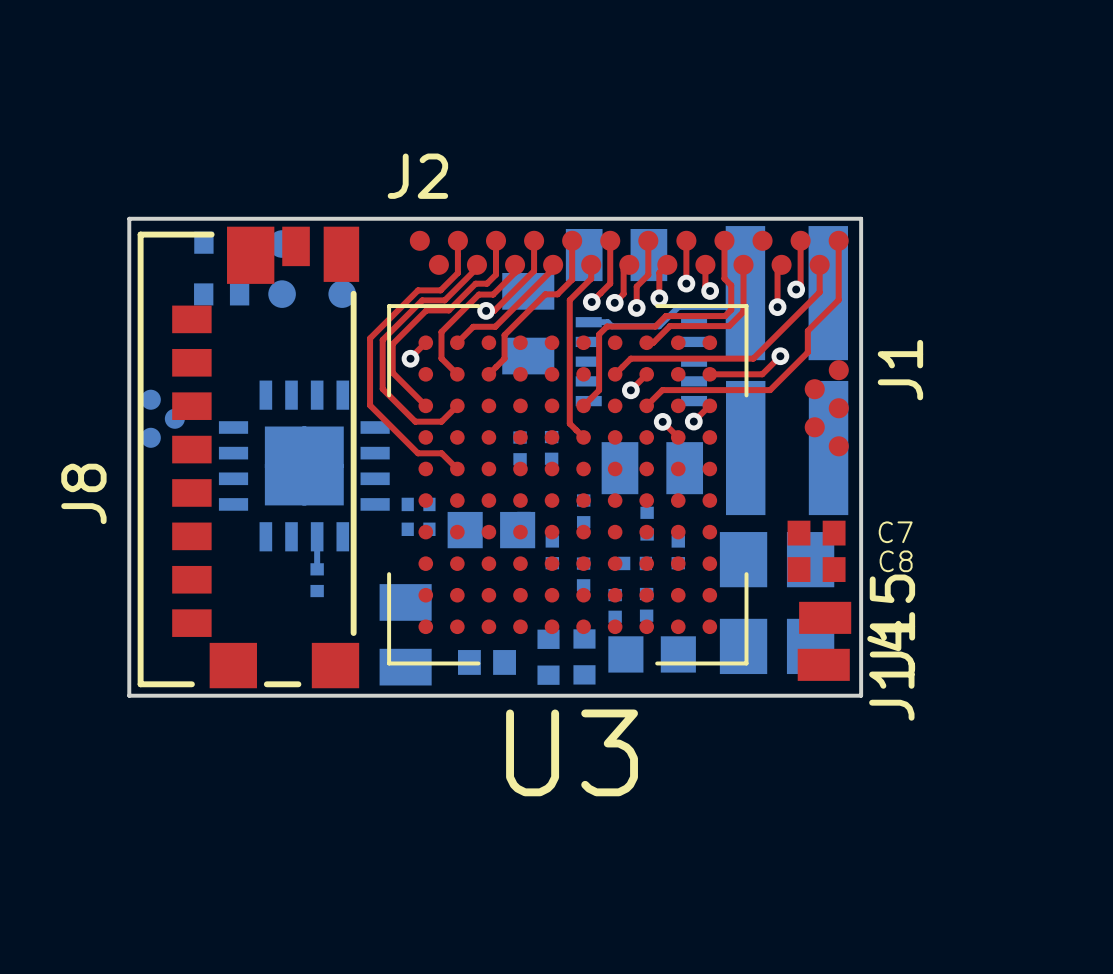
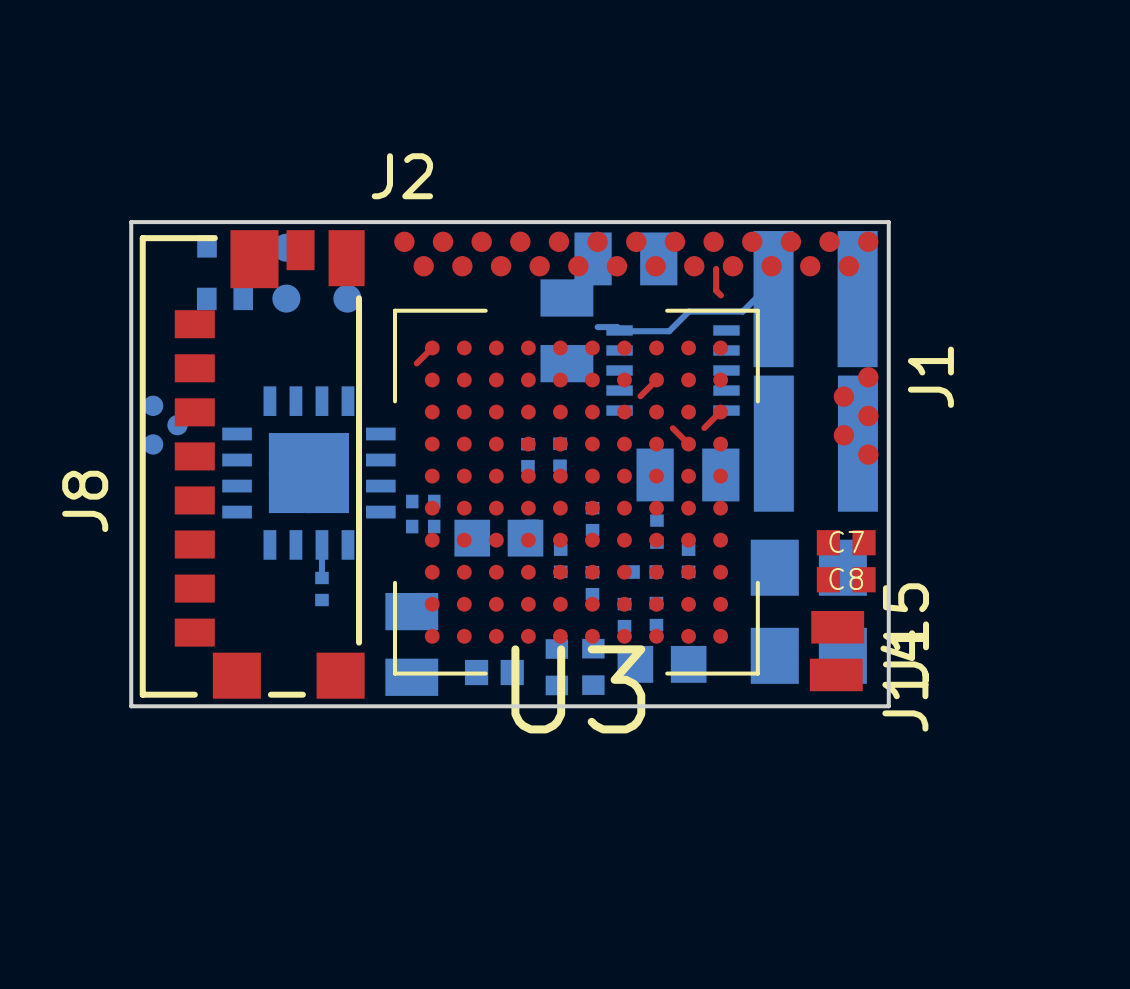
J2 name position: J2 (417, 176) -> J2 (402, 176)
board edge: (861, 218) (861, 695) -> (874, 222) (888, 222) (888, 706) (874, 706)
J2 footprint: [409, 230, 849, 275] -> [394, 231, 879, 277]
top track: (457, 240) (457, 273) (440, 290) (418, 290) (370, 338) (370, 405) (417, 453) (441, 453) (457, 468) -> none
top track: (496, 240) (496, 274) (486, 283) (475, 283) (448, 310) (426, 310) (392, 344) (392, 372) (425, 405) -> none
top track: (534, 240) (534, 271) (494, 310) (486, 310) -> none
top track: (572, 240) (572, 279) (557, 294) (545, 294) (504, 335) (504, 358) (488, 374) -> none
top track: (610, 240) (610, 283) (591, 302) -> none
top track: (648, 240) (648, 274) (636, 286) (636, 307) -> none
top track: (686, 240) (686, 283) -> none
top track: (724, 240) (724, 278) (731, 285) (731, 309) (725, 316) (665, 316) (655, 326) (607, 326) (599, 334) (599, 390) (583, 405) -> none
top track: (800, 240) (800, 285) (796, 289) -> none
top track: (838, 240) (838, 300) (807, 330) (807, 352) (770, 390) (662, 390) (646, 405) -> none
top track: (476, 264) (476, 268) (444, 300) (422, 300) (382, 339) (382, 389) (415, 421) (441, 421) (457, 405) -> none
top track: (515, 264) (515, 272) (493, 294) (478, 294) (441, 332) (441, 358) (457, 374) -> none
top track: (553, 264) (553, 268) (495, 326) (473, 326) (457, 342) -> none
top track: (591, 264) (591, 278) (569, 300) (569, 423) (583, 437) -> none
top track: (629, 264) (623, 270) (623, 293) (614, 302) -> none
top track: (667, 264) (659, 272) (659, 298) -> none
top track: (743, 264) (743, 311) (729, 326) (669, 326) (653, 342) (646, 342) -> none
top track: (781, 264) (777, 268) (777, 307) -> none
top track: (819, 264) (819, 292) (753, 358) (630, 358) (615, 374) -> none
via: (686, 283) -> none
via: (796, 289) -> none
via: (710, 291) -> none
part position: (786, 293) -> (815, 299)
via: (659, 298) -> none
via: (591, 302) -> none
via: (614, 302) -> none
via: (636, 307) -> none
via: (777, 307) -> none
via: (486, 310) -> none
part position: (528, 323) -> (566, 330)
top track: (780, 356) (762, 374) (709, 374) -> none
via: (780, 356) -> none
via: (410, 358) -> none
part position: (641, 361) -> (673, 370)
via: (630, 390) -> none
J1 position: (826, 408) -> (856, 415)
via: (662, 421) -> none
via: (693, 421) -> none
part position: (787, 448) -> (815, 443)
part position: (652, 468) -> (687, 474)
part: none -> (423, 501)
part: (418, 504) -> none
part: none -> (423, 526)
part: (418, 529) -> none
C7 name position: C7 (895, 532) -> C7 (846, 541)
C7 position: (816, 533) -> (846, 542)
C8 name position: C8 (896, 561) -> C8 (846, 579)
C8 position: (816, 569) -> (846, 579)
part position: (777, 603) -> (808, 611)
U3 name position: U3 (572, 752) -> U3 (578, 689)

